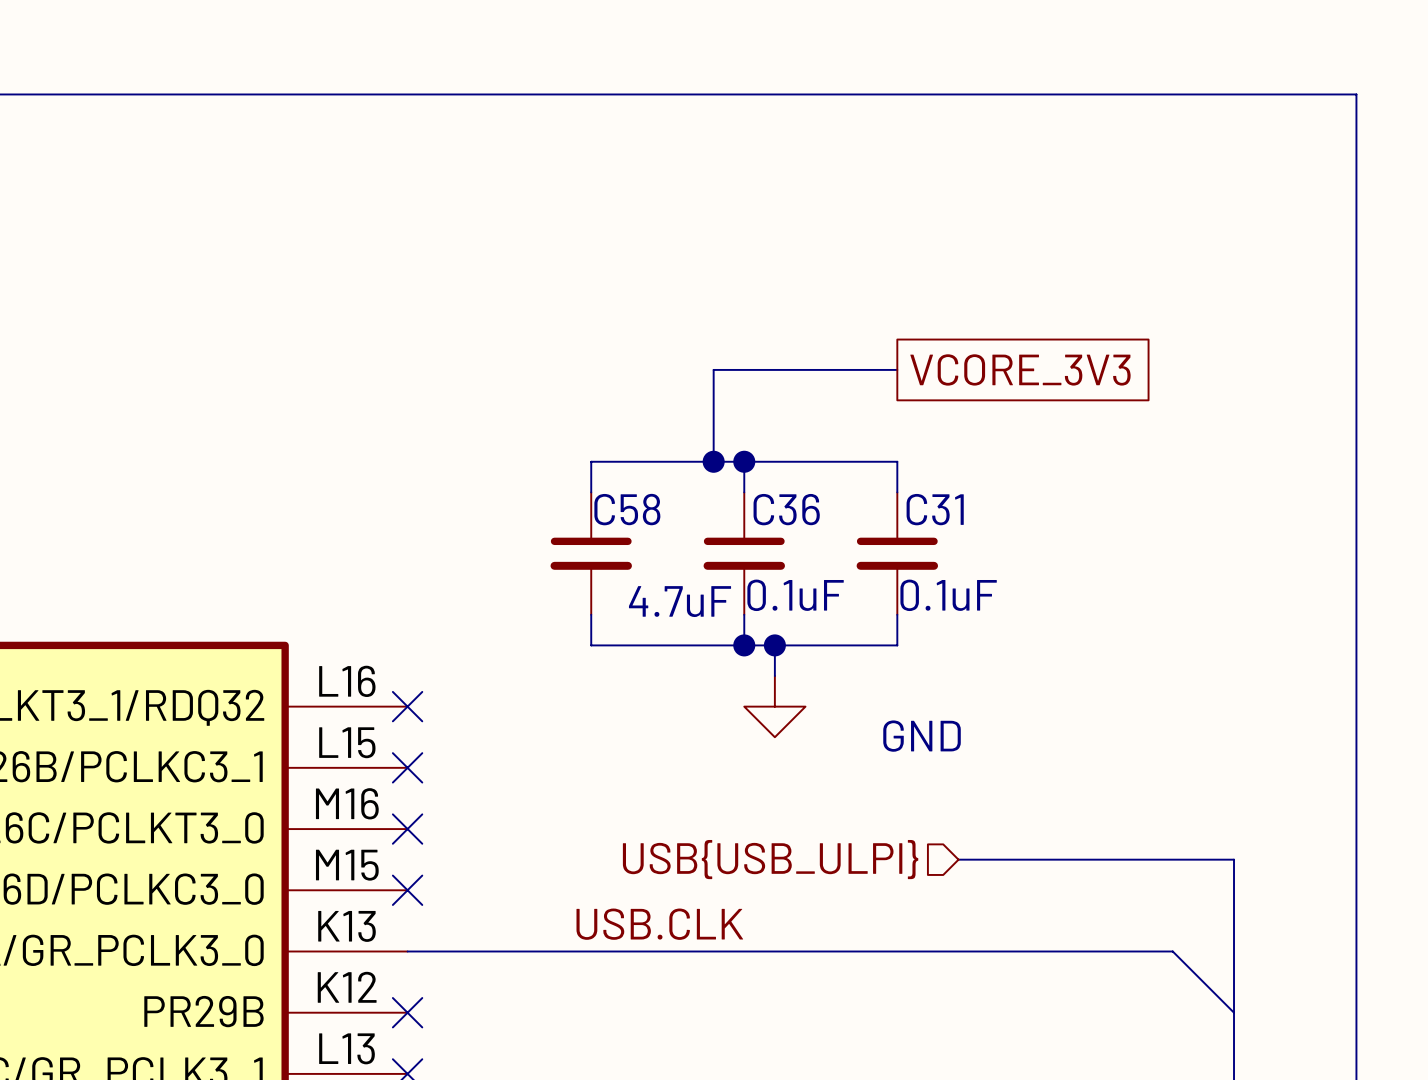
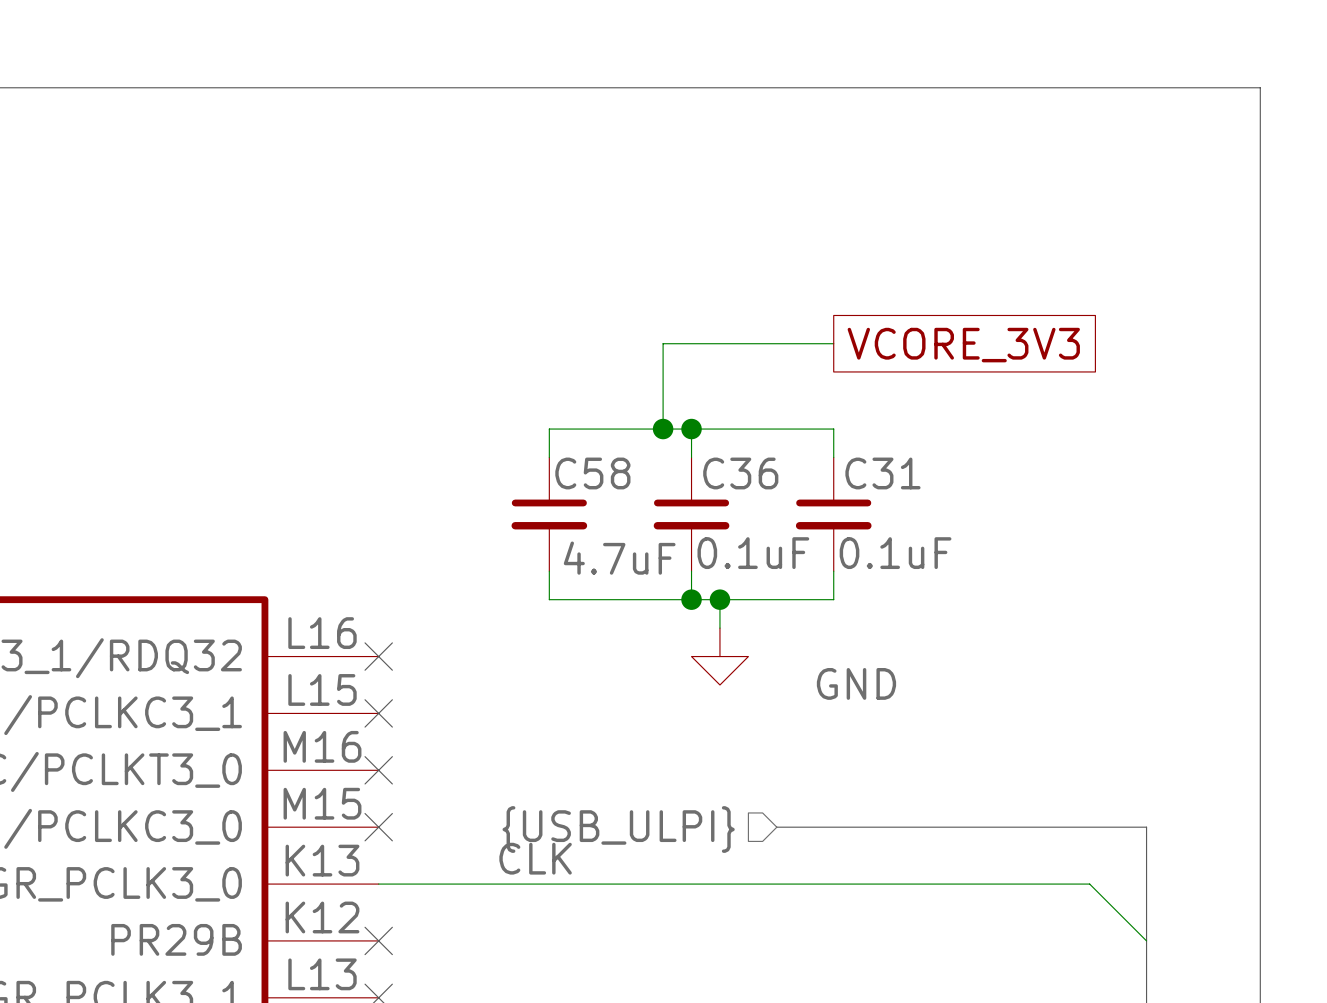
hierarchical label: USB{USB_ULPI} (770, 859) -> {USB_ULPI} (618, 829)
bus: (958, 859) (1234, 859) (1234, 890) -> (776, 827) (1146, 827)
label: none -> CLK (535, 858)
label: USB.CLK (659, 924) -> none

